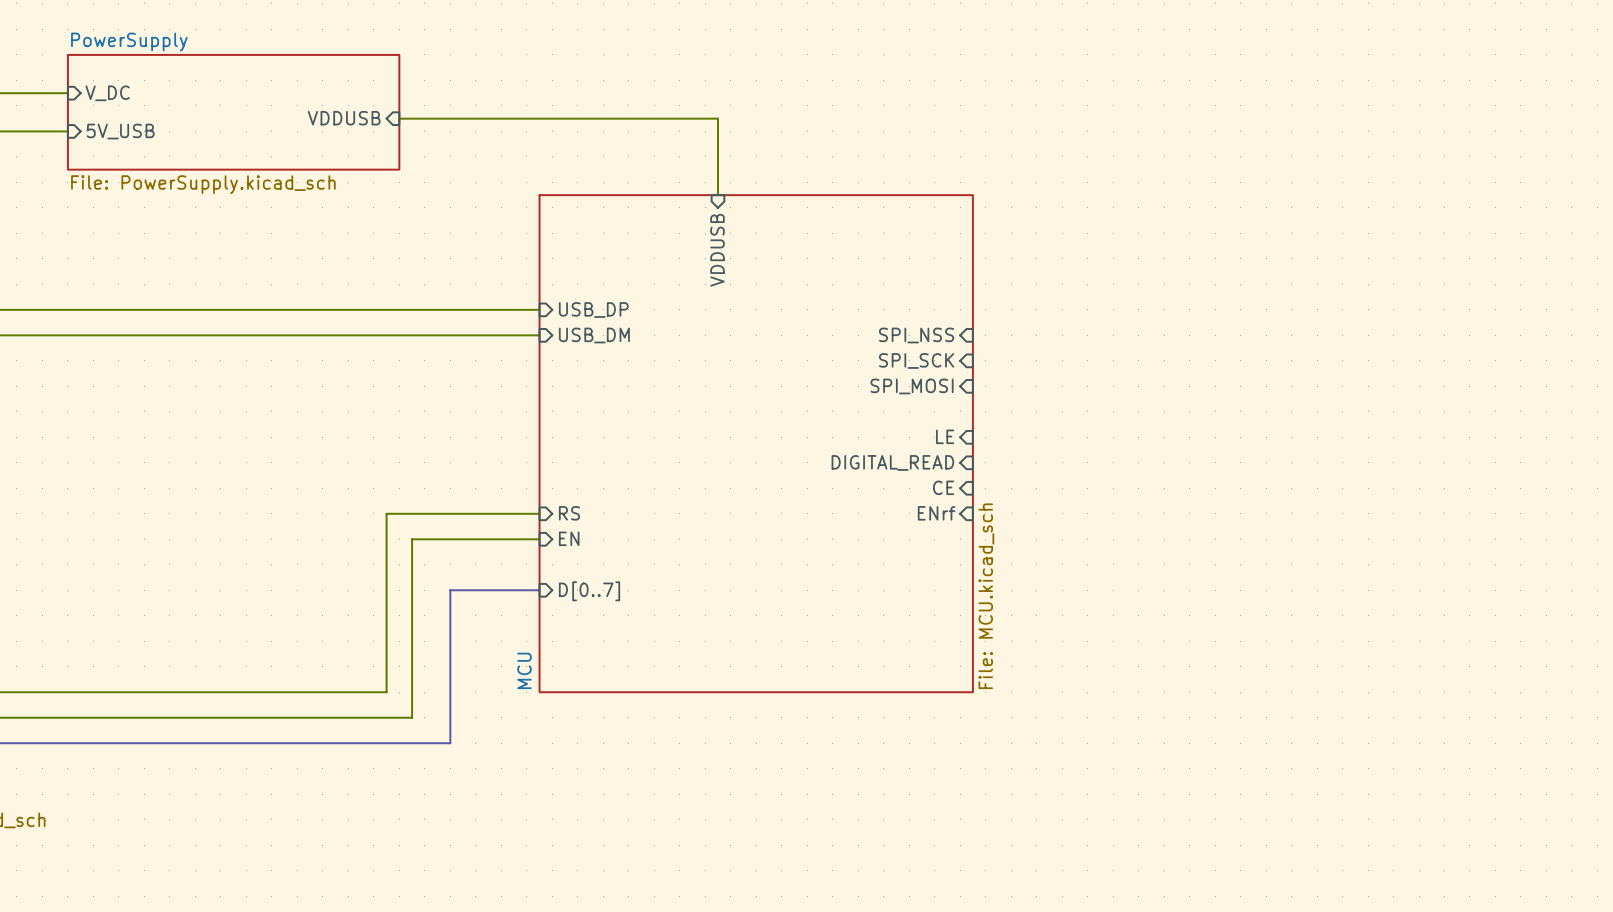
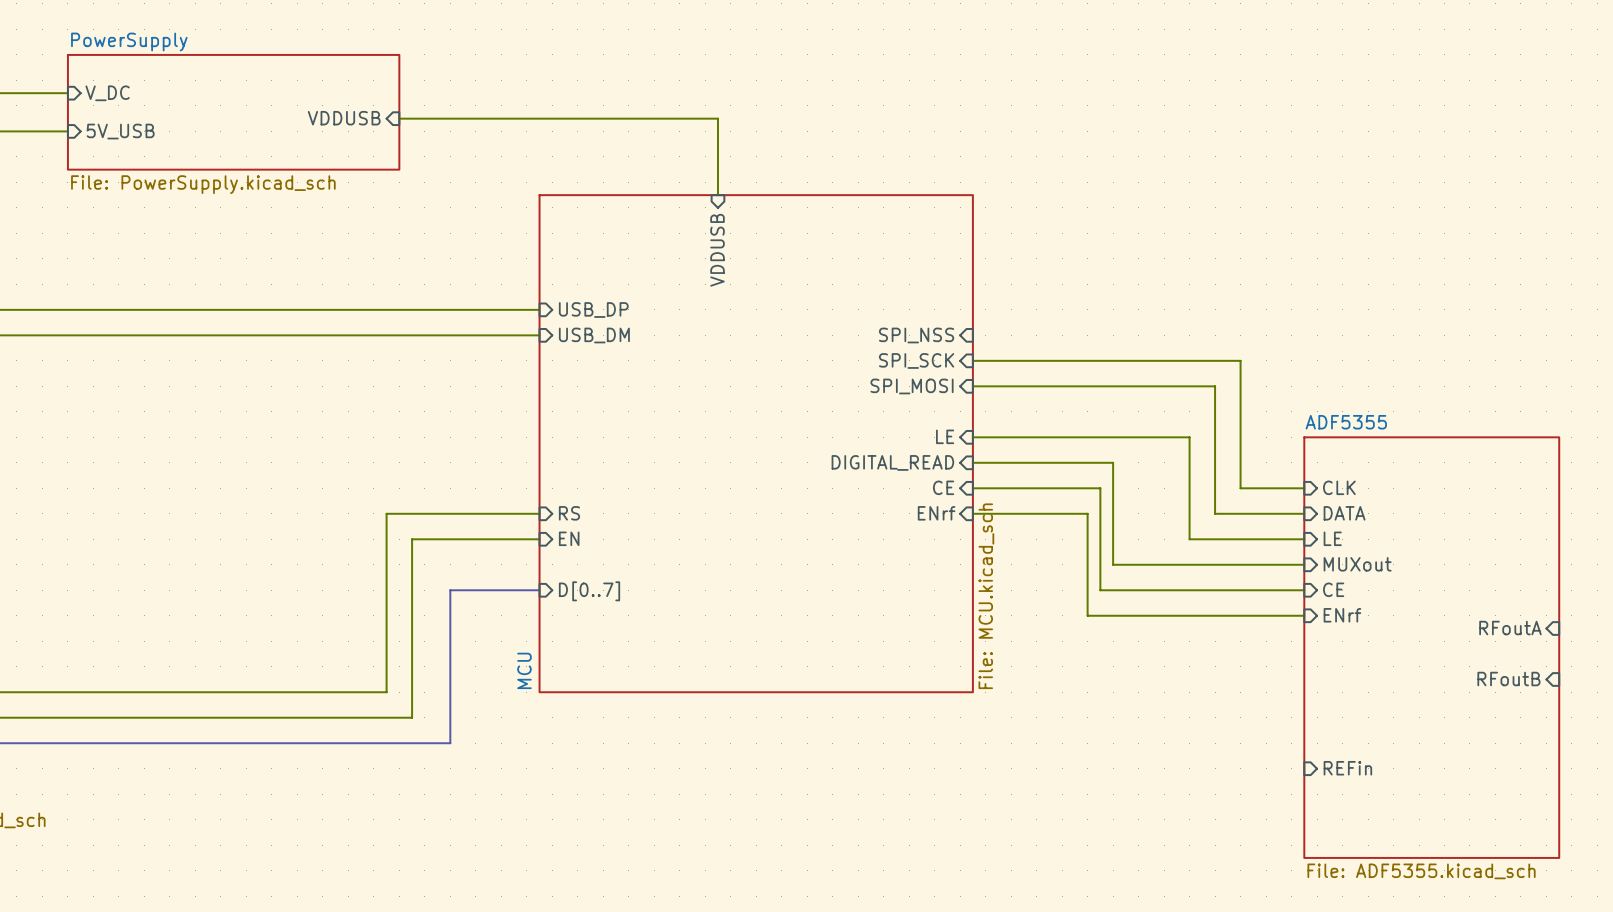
wire: none -> (972, 360) (1240, 360) (1240, 488) (1304, 488)
wire: none -> (972, 386) (1215, 386) (1215, 513) (1304, 513)
wire: none -> (972, 437) (1189, 437) (1189, 539) (1304, 539)
wire: none -> (972, 462) (1113, 462) (1113, 564) (1304, 564)
sheet pin: none -> CLK (1339, 487)
wire: none -> (972, 488) (1100, 488) (1100, 590) (1304, 590)
wire: none -> (972, 513) (1087, 513) (1087, 615) (1304, 615)
sheet pin: none -> DATA (1344, 513)
sheet pin: none -> LE (1332, 538)
sheet pin: none -> MUXout (1357, 564)
sheet pin: none -> CE (1333, 589)
sheet pin: none -> ENrf (1342, 615)
sheet pin: none -> RFoutA (1510, 628)
sheet ADF5355: none -> File: ADF5355.kicad_sch (1431, 647)
sheet pin: none -> RFoutB (1508, 679)
sheet pin: none -> REFin (1347, 768)

